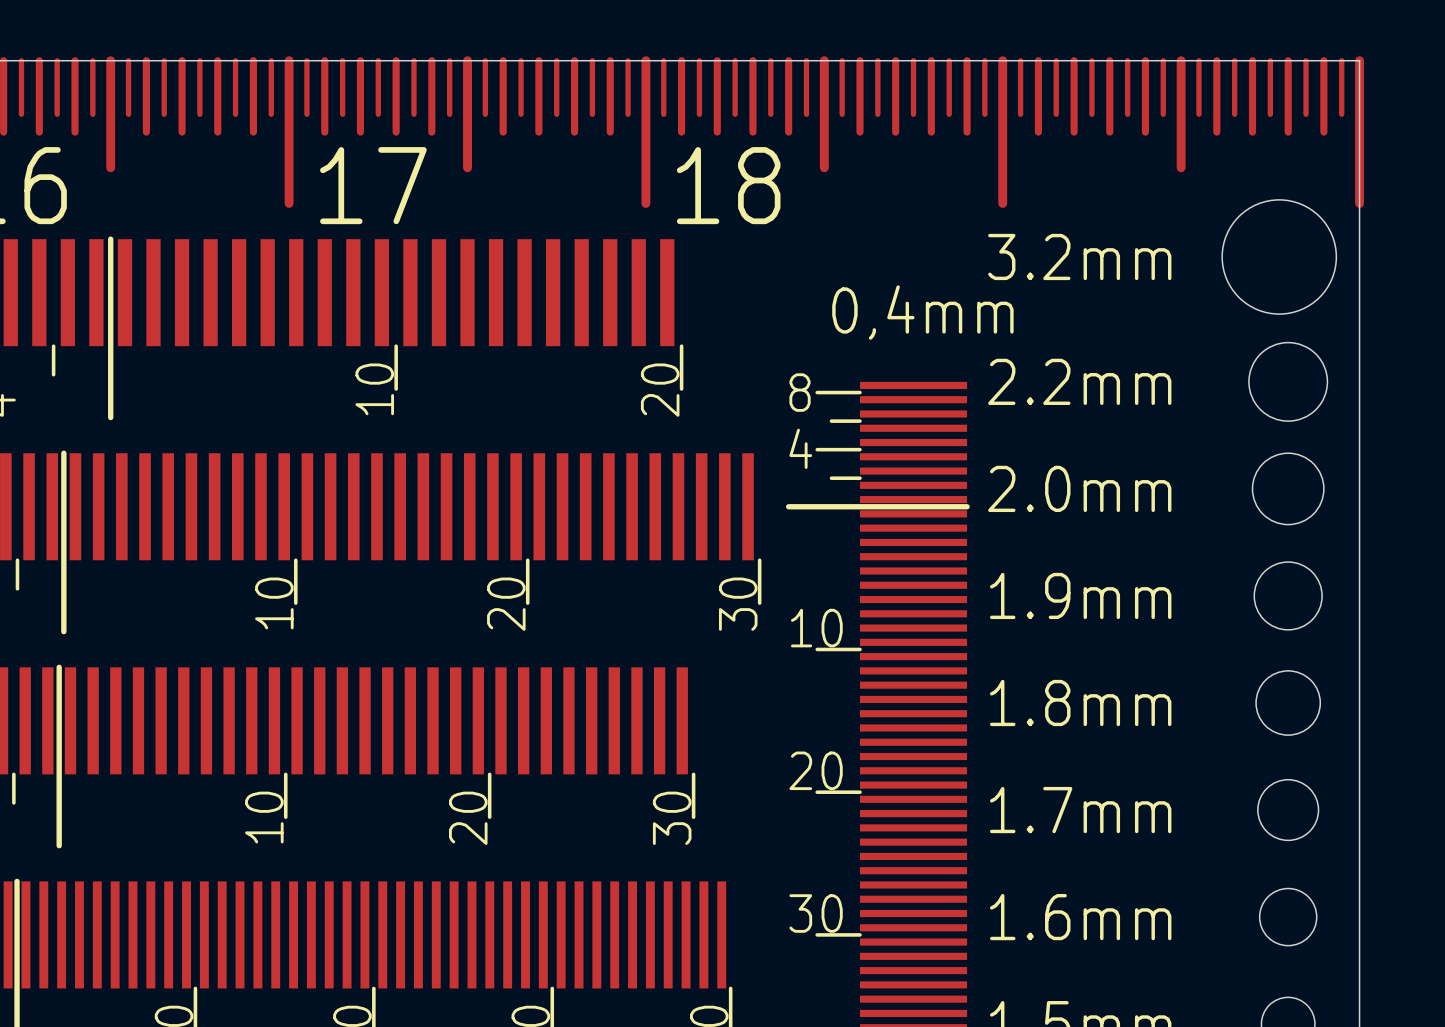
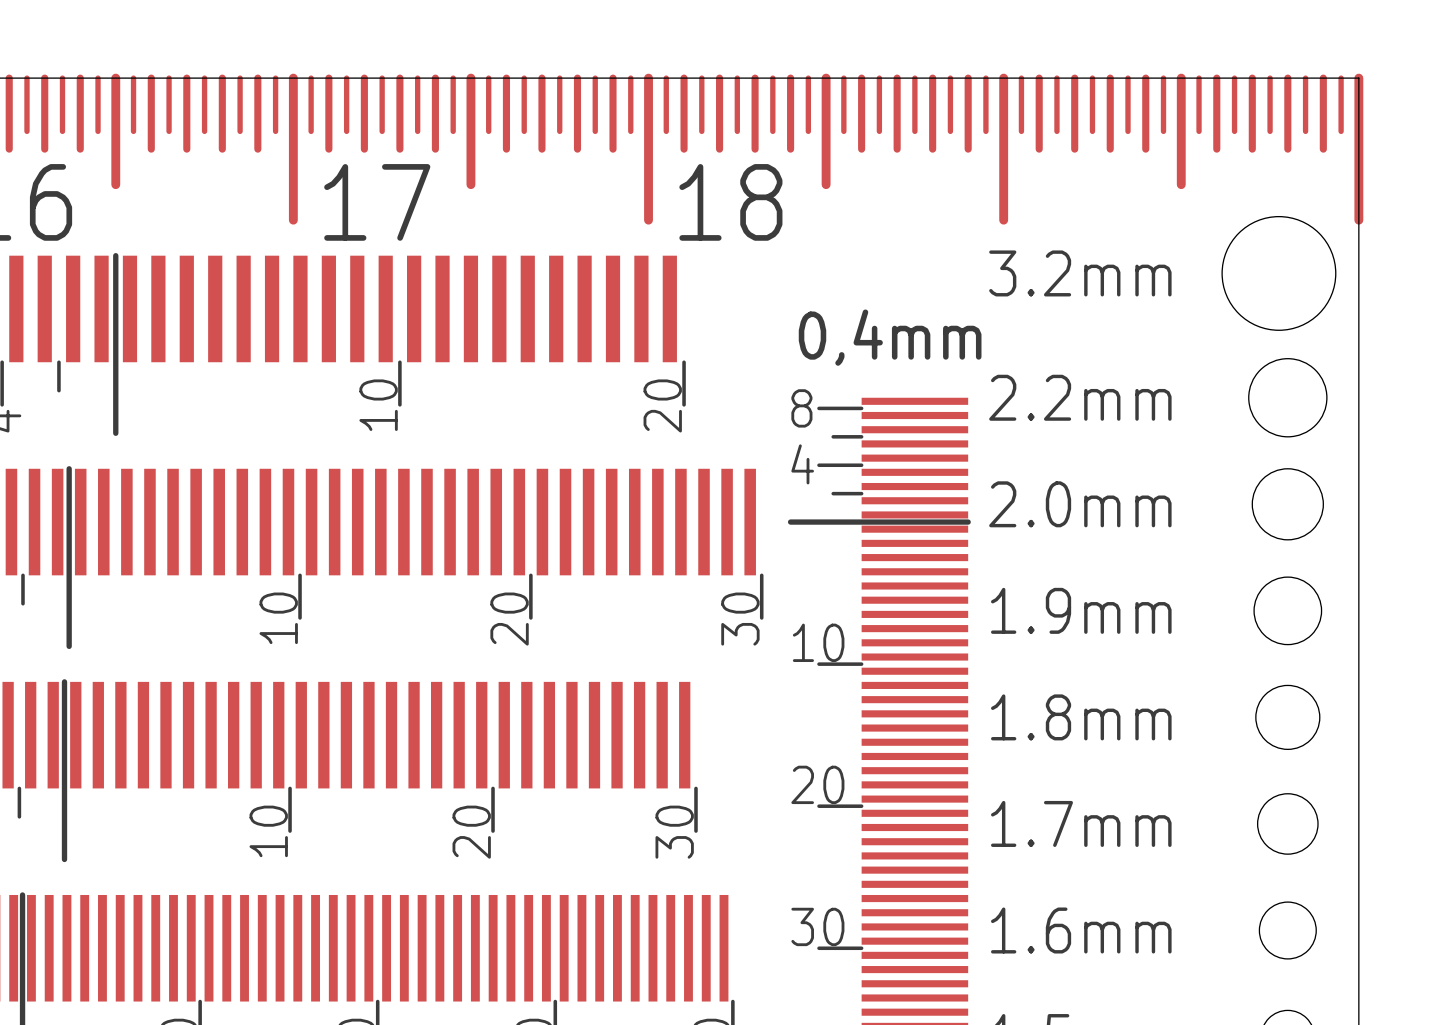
text position: 0,4mm (922, 312) -> 0,4mm (890, 337)

